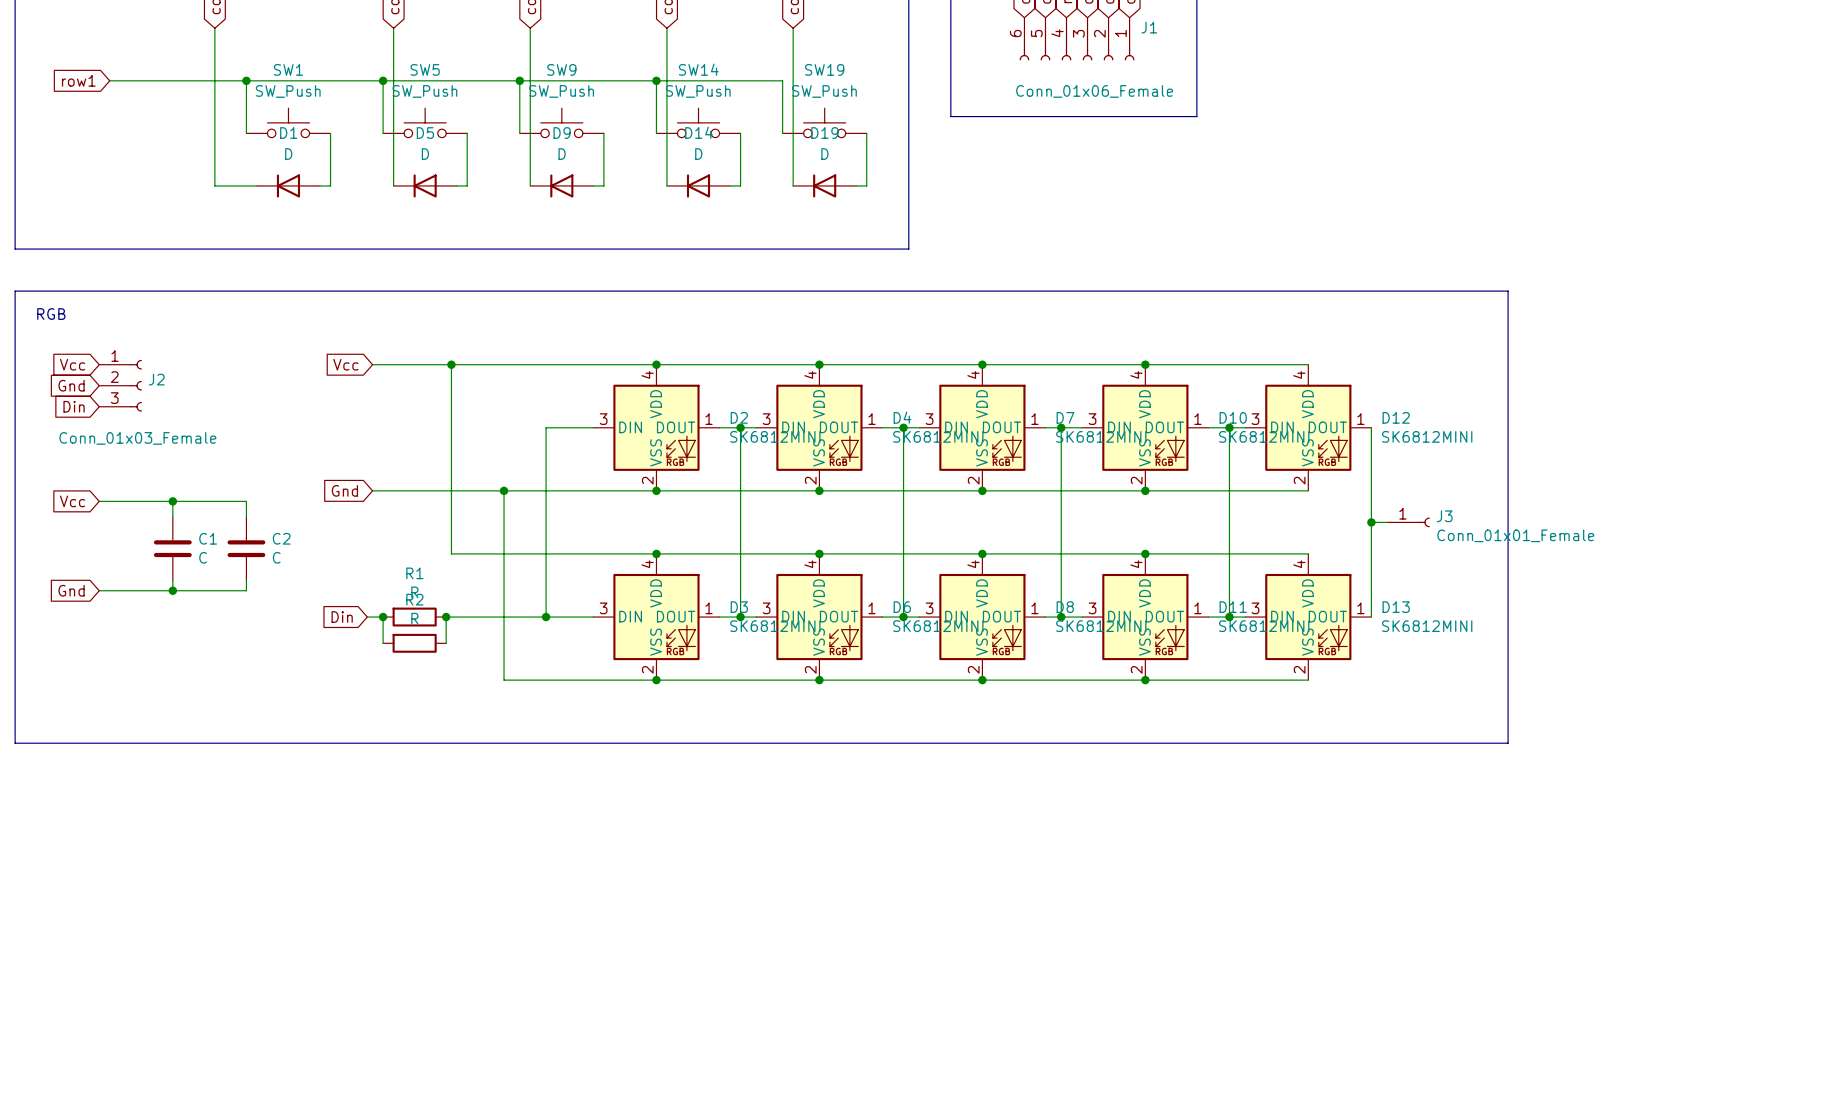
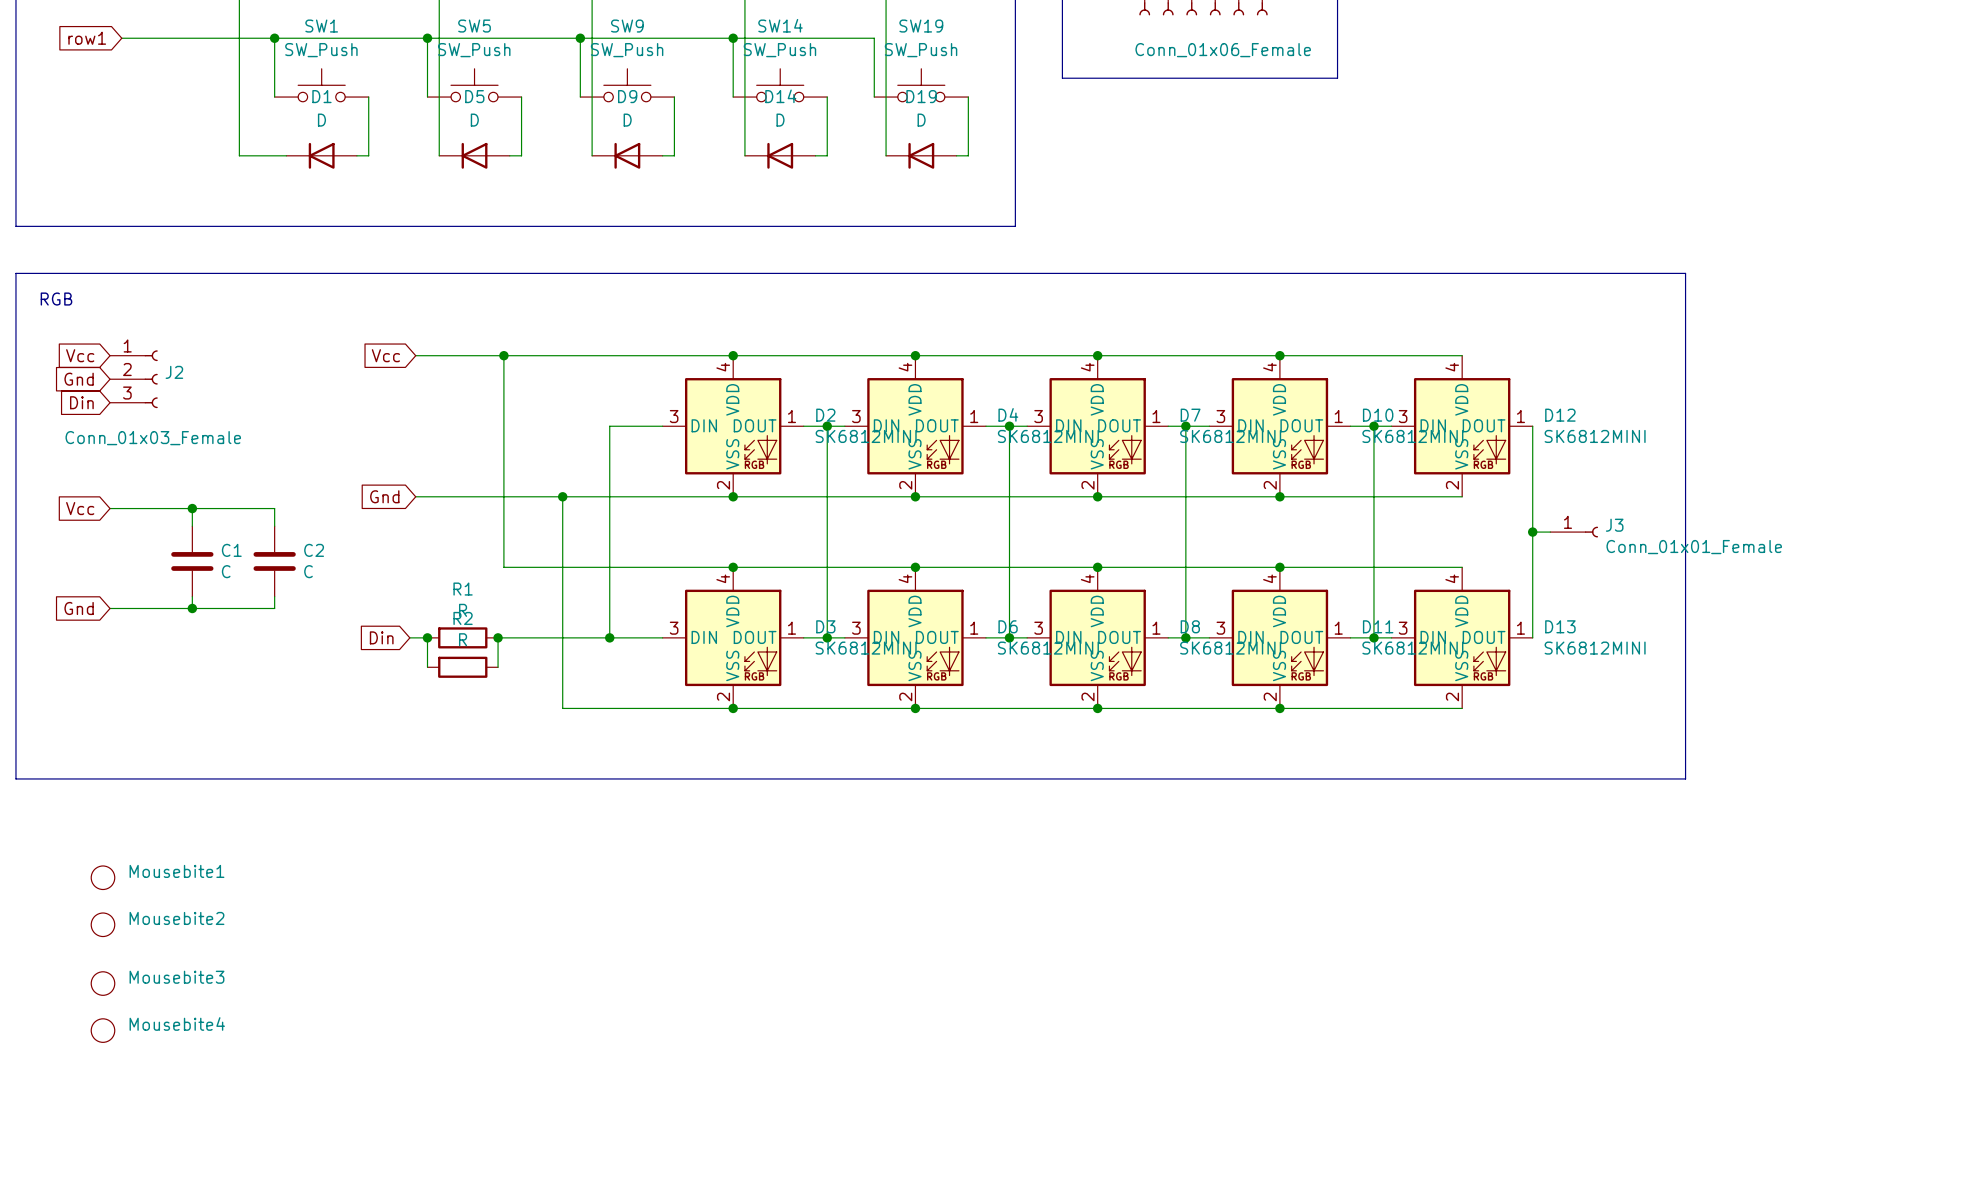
Mousebite1: none -> (102, 877)
Mousebite2: none -> (102, 924)
Mousebite3: none -> (102, 983)
Mousebite4: none -> (102, 1030)

